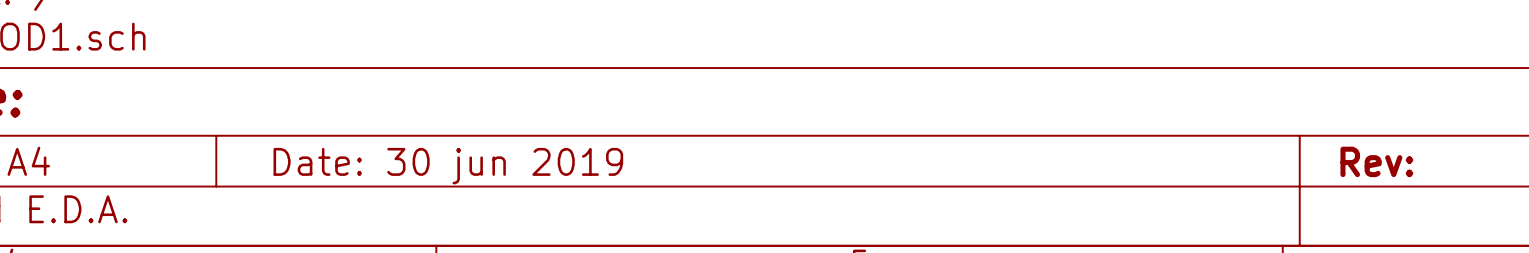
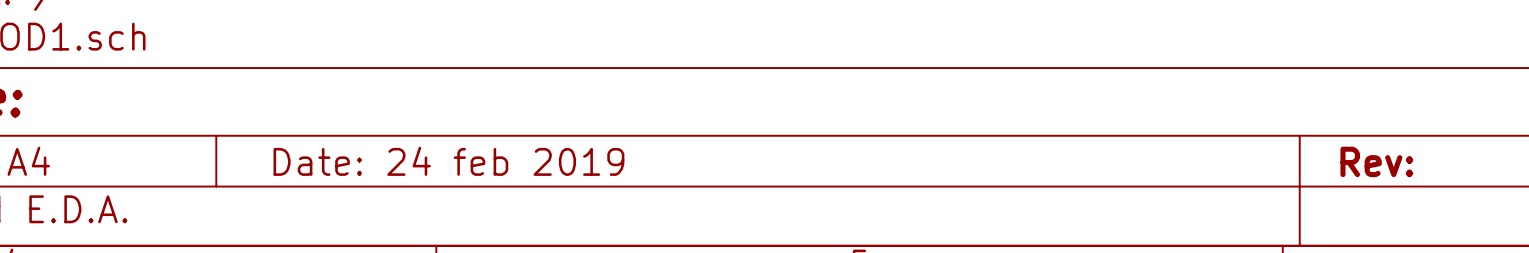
title block: Date: 30 jun 2019 (448, 166) -> Date: 24 feb 2019 (448, 161)

